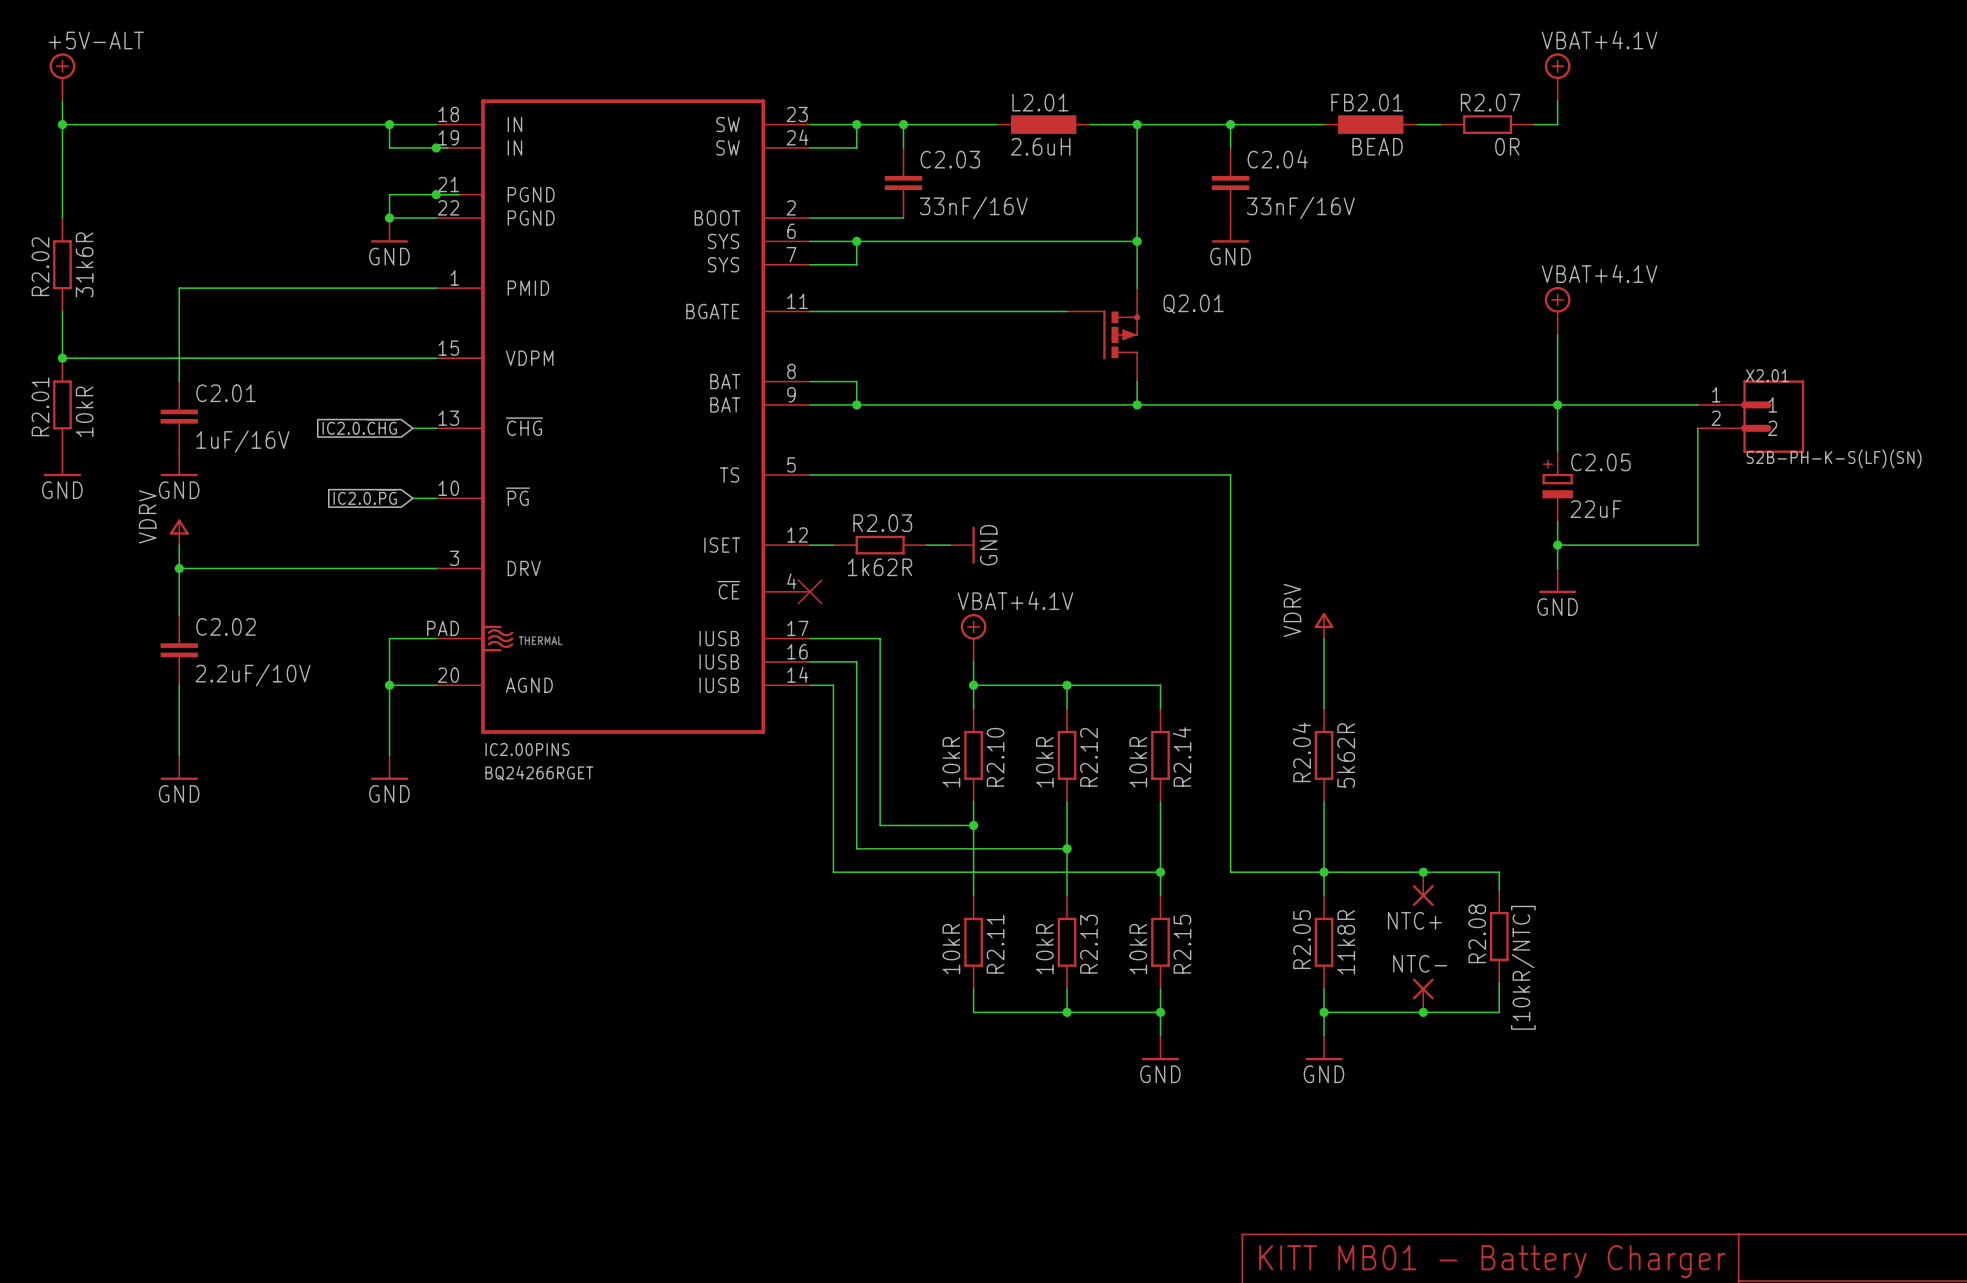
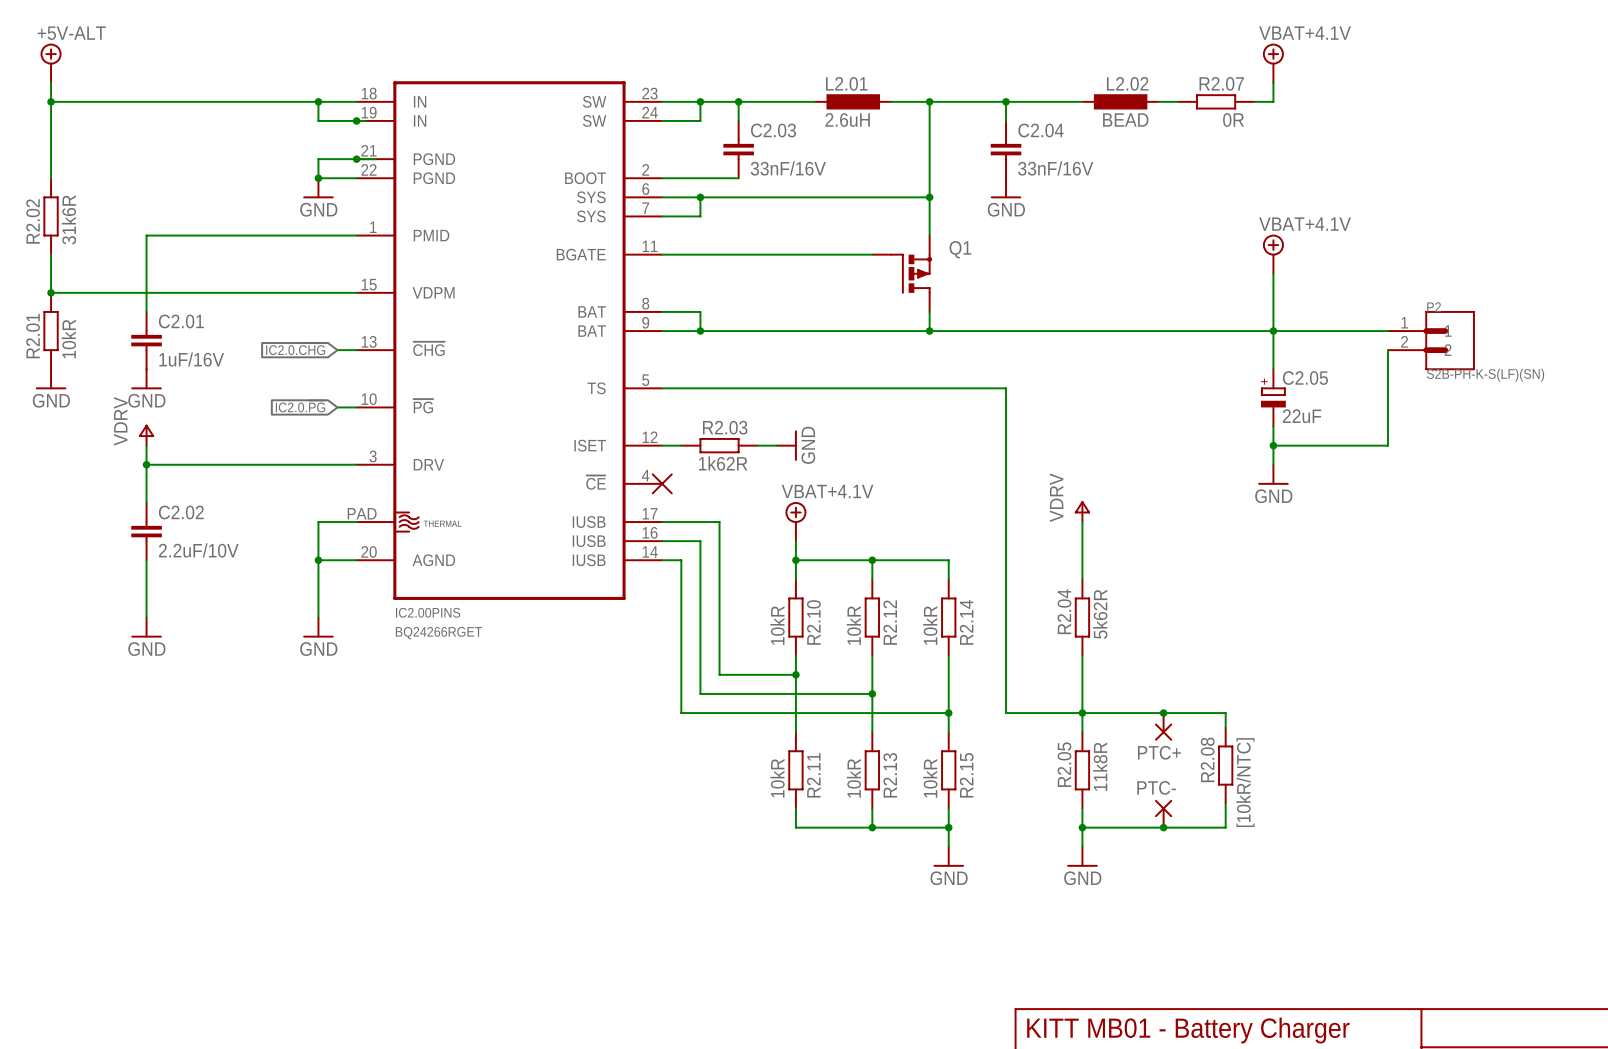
FB2.01 name: FB2.01 (1367, 102) -> L2.02 (1127, 83)
Q2.01 name: Q2.01 (1193, 304) -> Q1 (960, 249)
X2.01 name: X2.01 (1767, 375) -> P2 (1434, 307)
NTC+ name: NTC+ (1414, 920) -> PTC+ (1159, 752)
NTC- name: NTC- (1420, 963) -> PTC- (1156, 787)

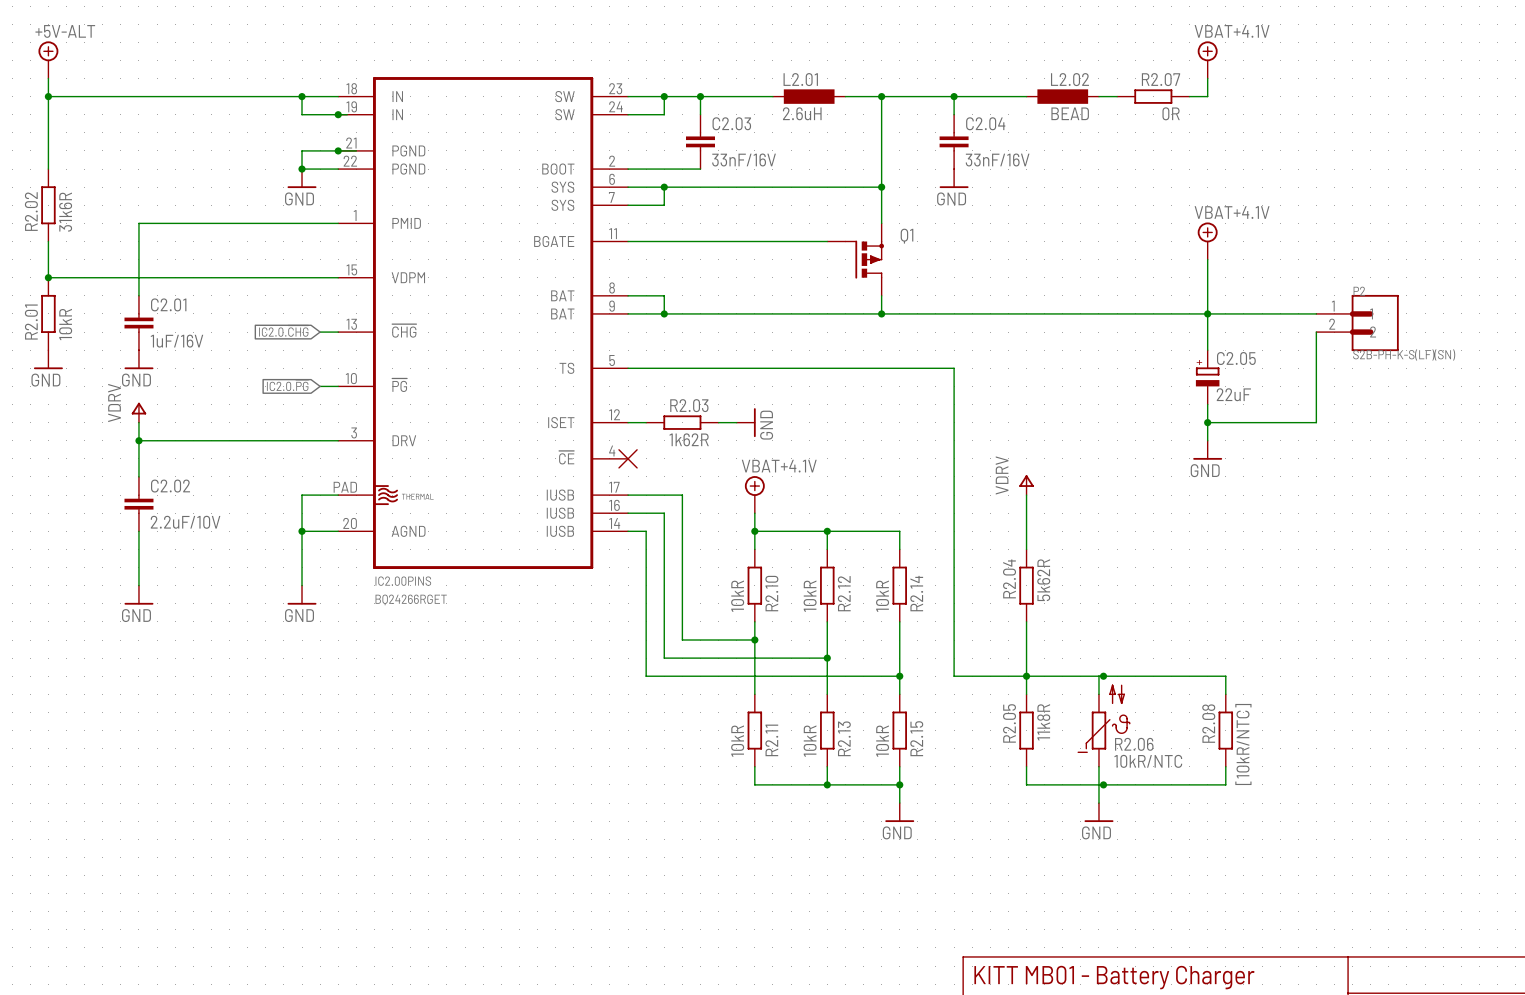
wire: (1225, 713) (1225, 727) -> (1162, 676) (1225, 676) (1225, 694)
PTC+: (1163, 726) -> none
R2.06: none -> 10kR/NTC (1103, 725)
R2.08 position: (1225, 765) -> (1225, 730)
wire: (1225, 803) (1225, 827) -> (1225, 766) (1225, 784) (1162, 784)
wire: none -> (1098, 766) (1098, 803)
PTC-: (1163, 813) -> none
wire: (1082, 827) (1082, 846) -> (1098, 676) (1098, 694)
junction: (1082, 827) -> none
power symbol position: GND (1082, 856) -> GND (1098, 812)

